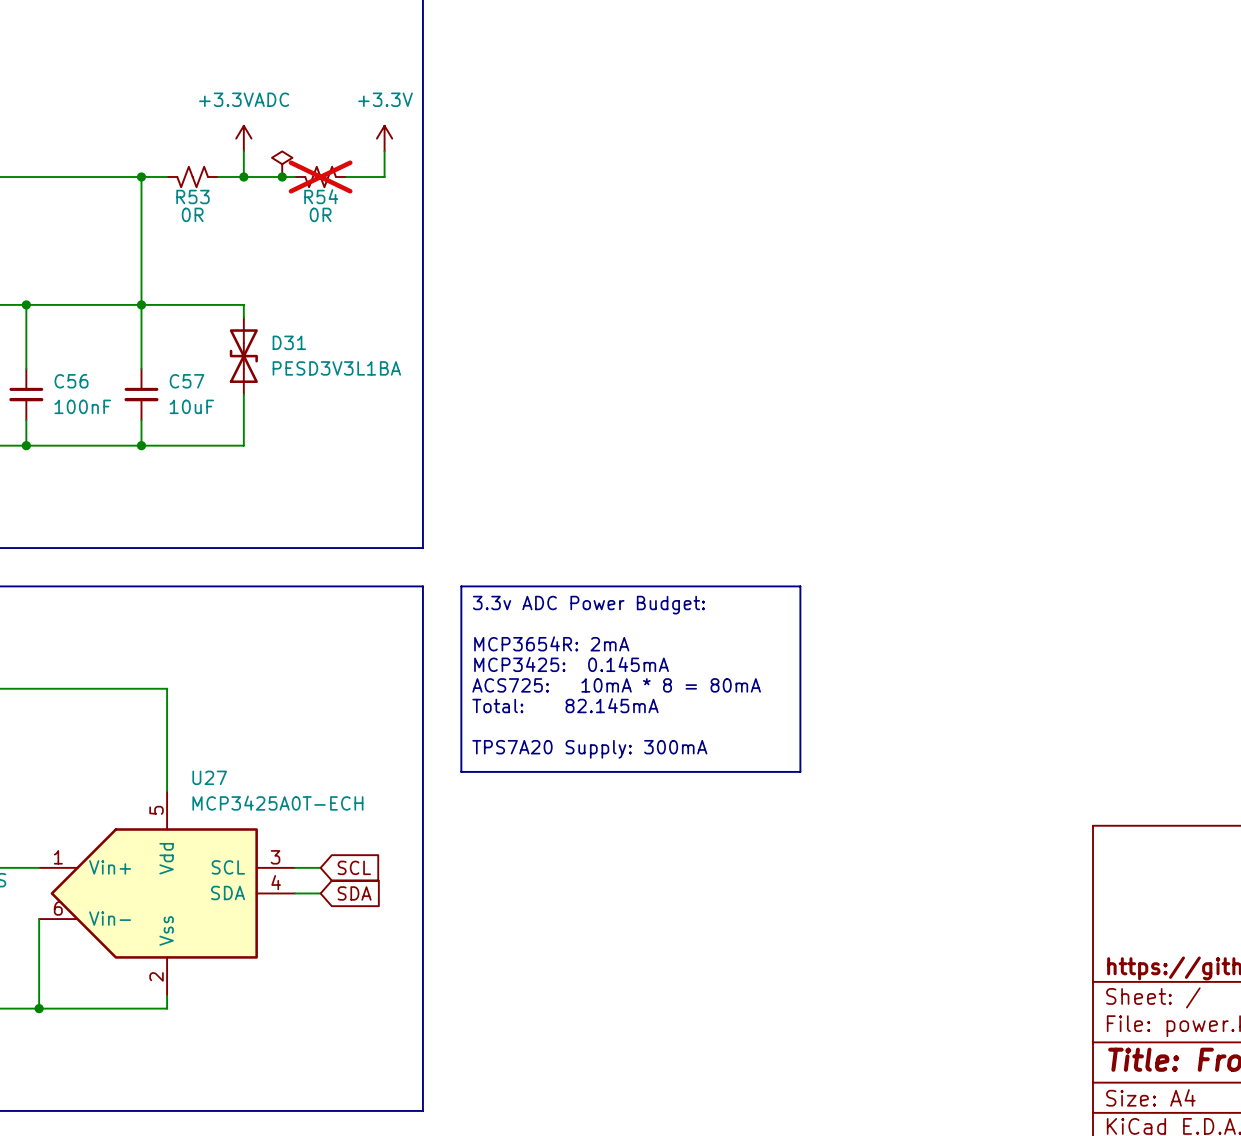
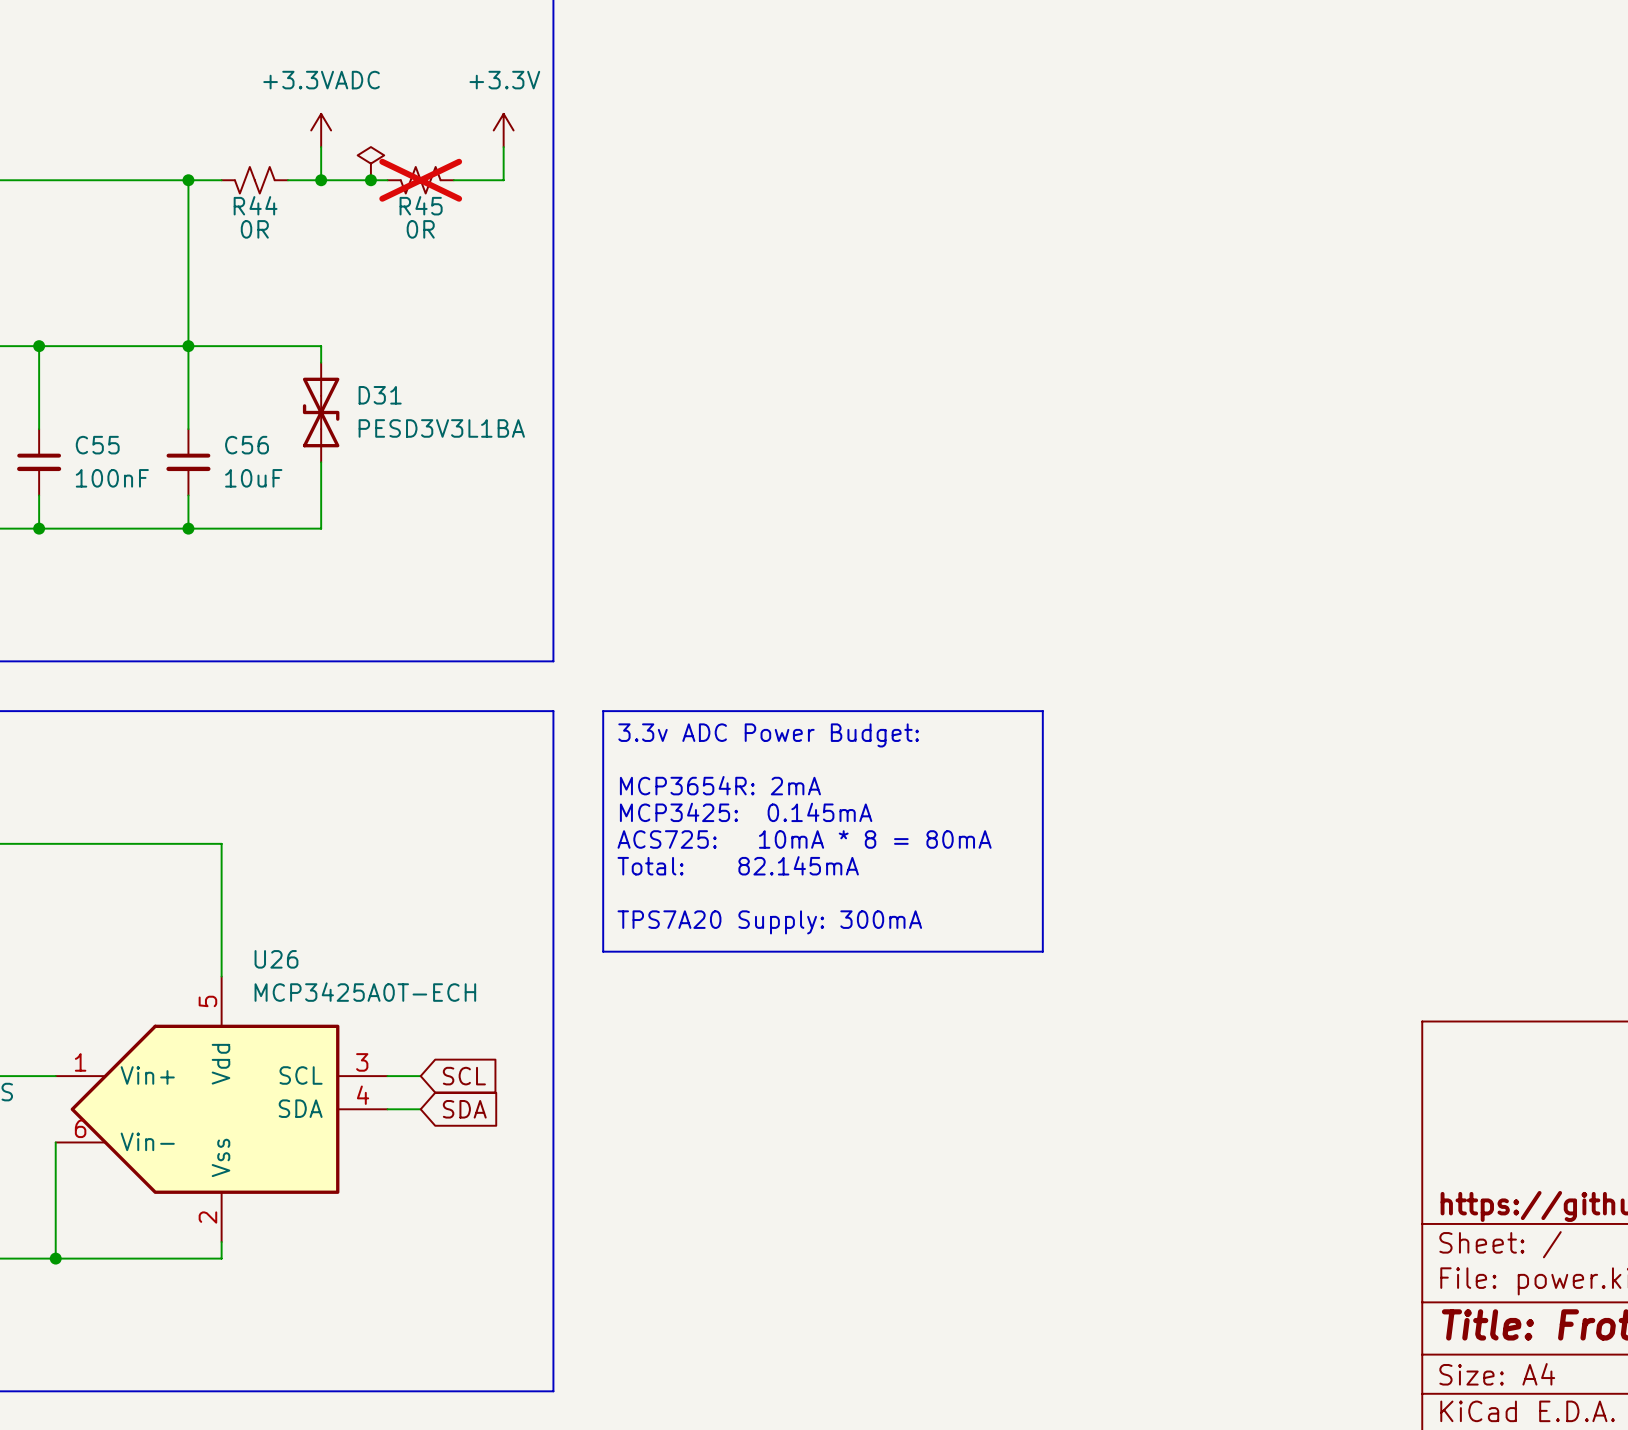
R53 name: R53 (192, 196) -> R44 (255, 205)
R54 name: R54 (321, 196) -> R45 (421, 205)
C56 name: C56 (71, 381) -> C55 (97, 445)
C57 name: C57 (186, 381) -> C56 (247, 445)
U27 name: U27 (209, 777) -> U26 (276, 959)

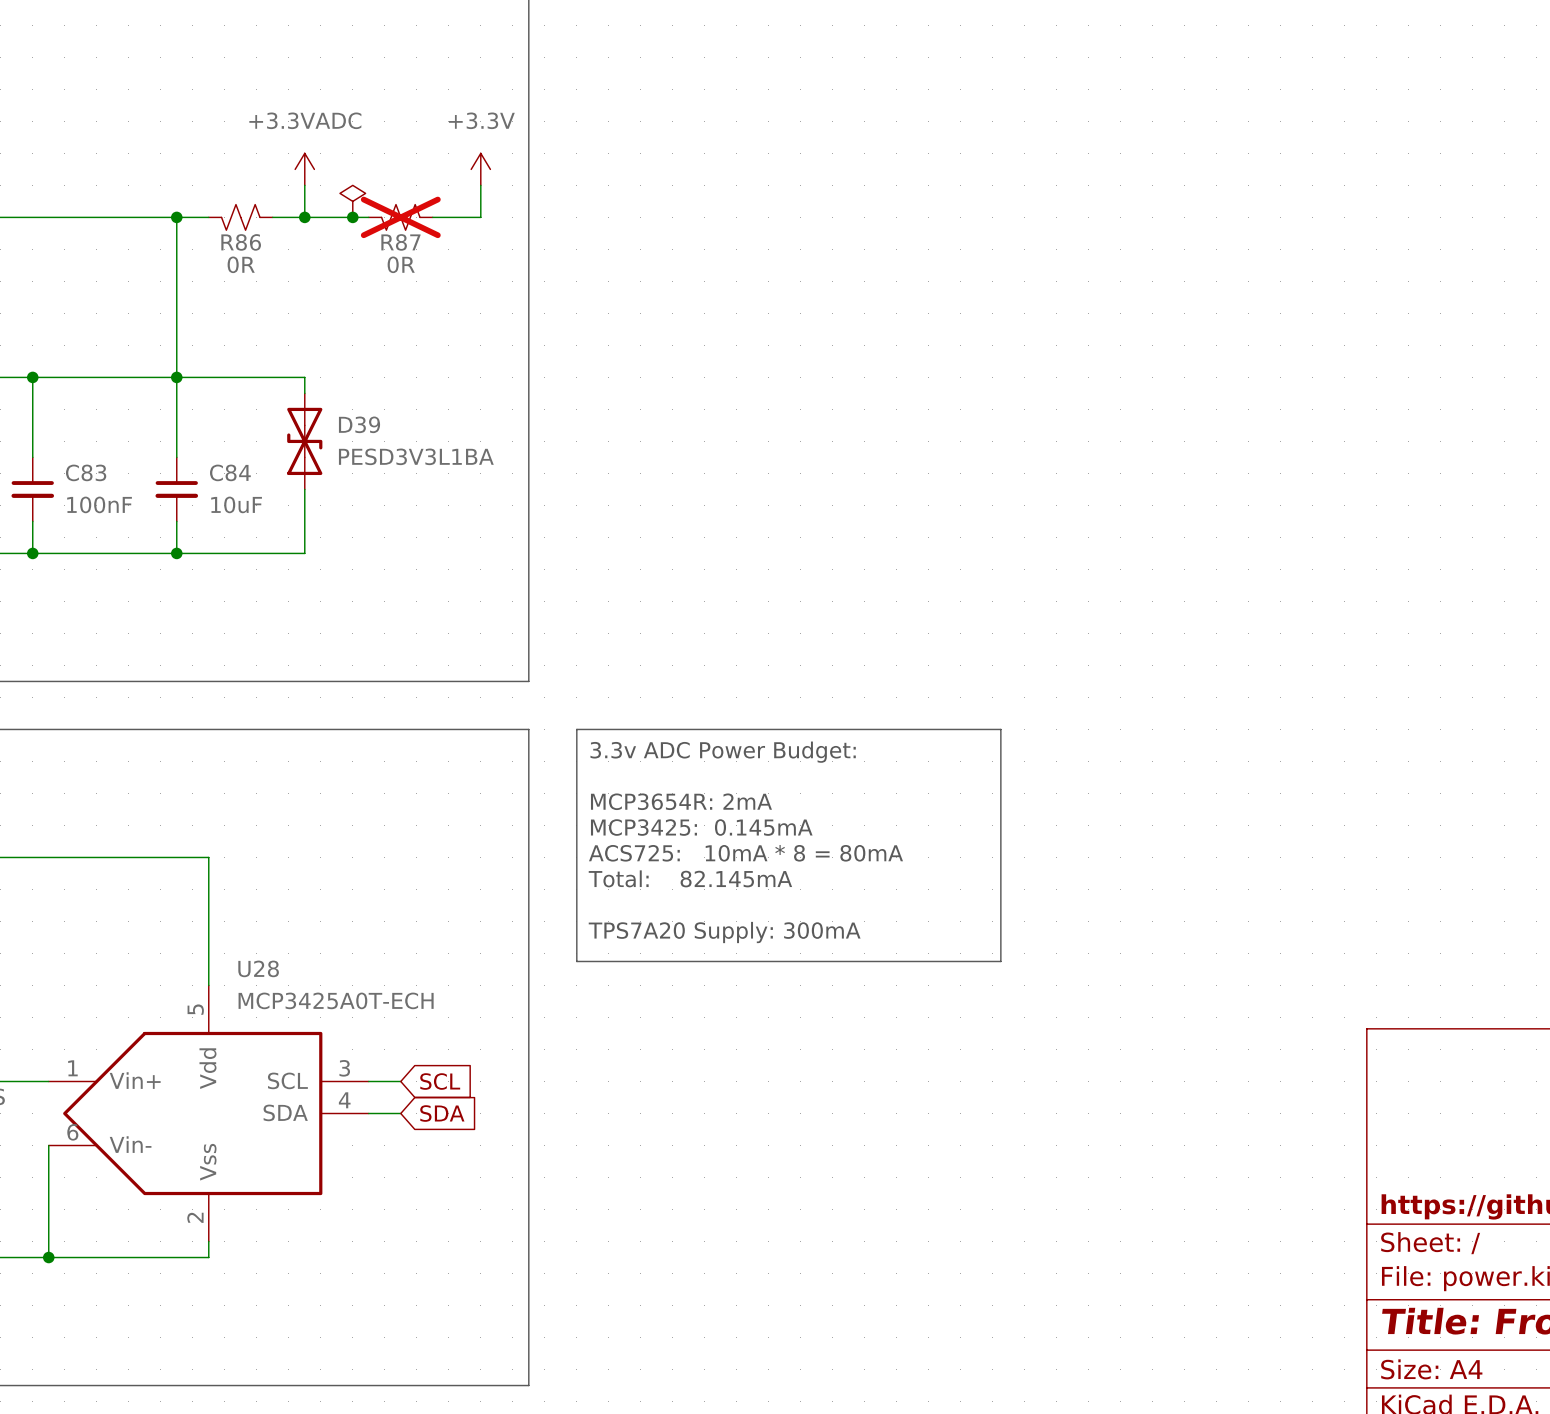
R44 name: R44 (255, 205) -> R86 (241, 242)
R45 name: R45 (421, 205) -> R87 (400, 242)
D31 name: D31 (380, 395) -> D39 (359, 424)
C55 name: C55 (97, 445) -> C83 (86, 472)
C56 name: C56 (247, 445) -> C84 (230, 472)
U26 name: U26 (276, 959) -> U28 (258, 968)

